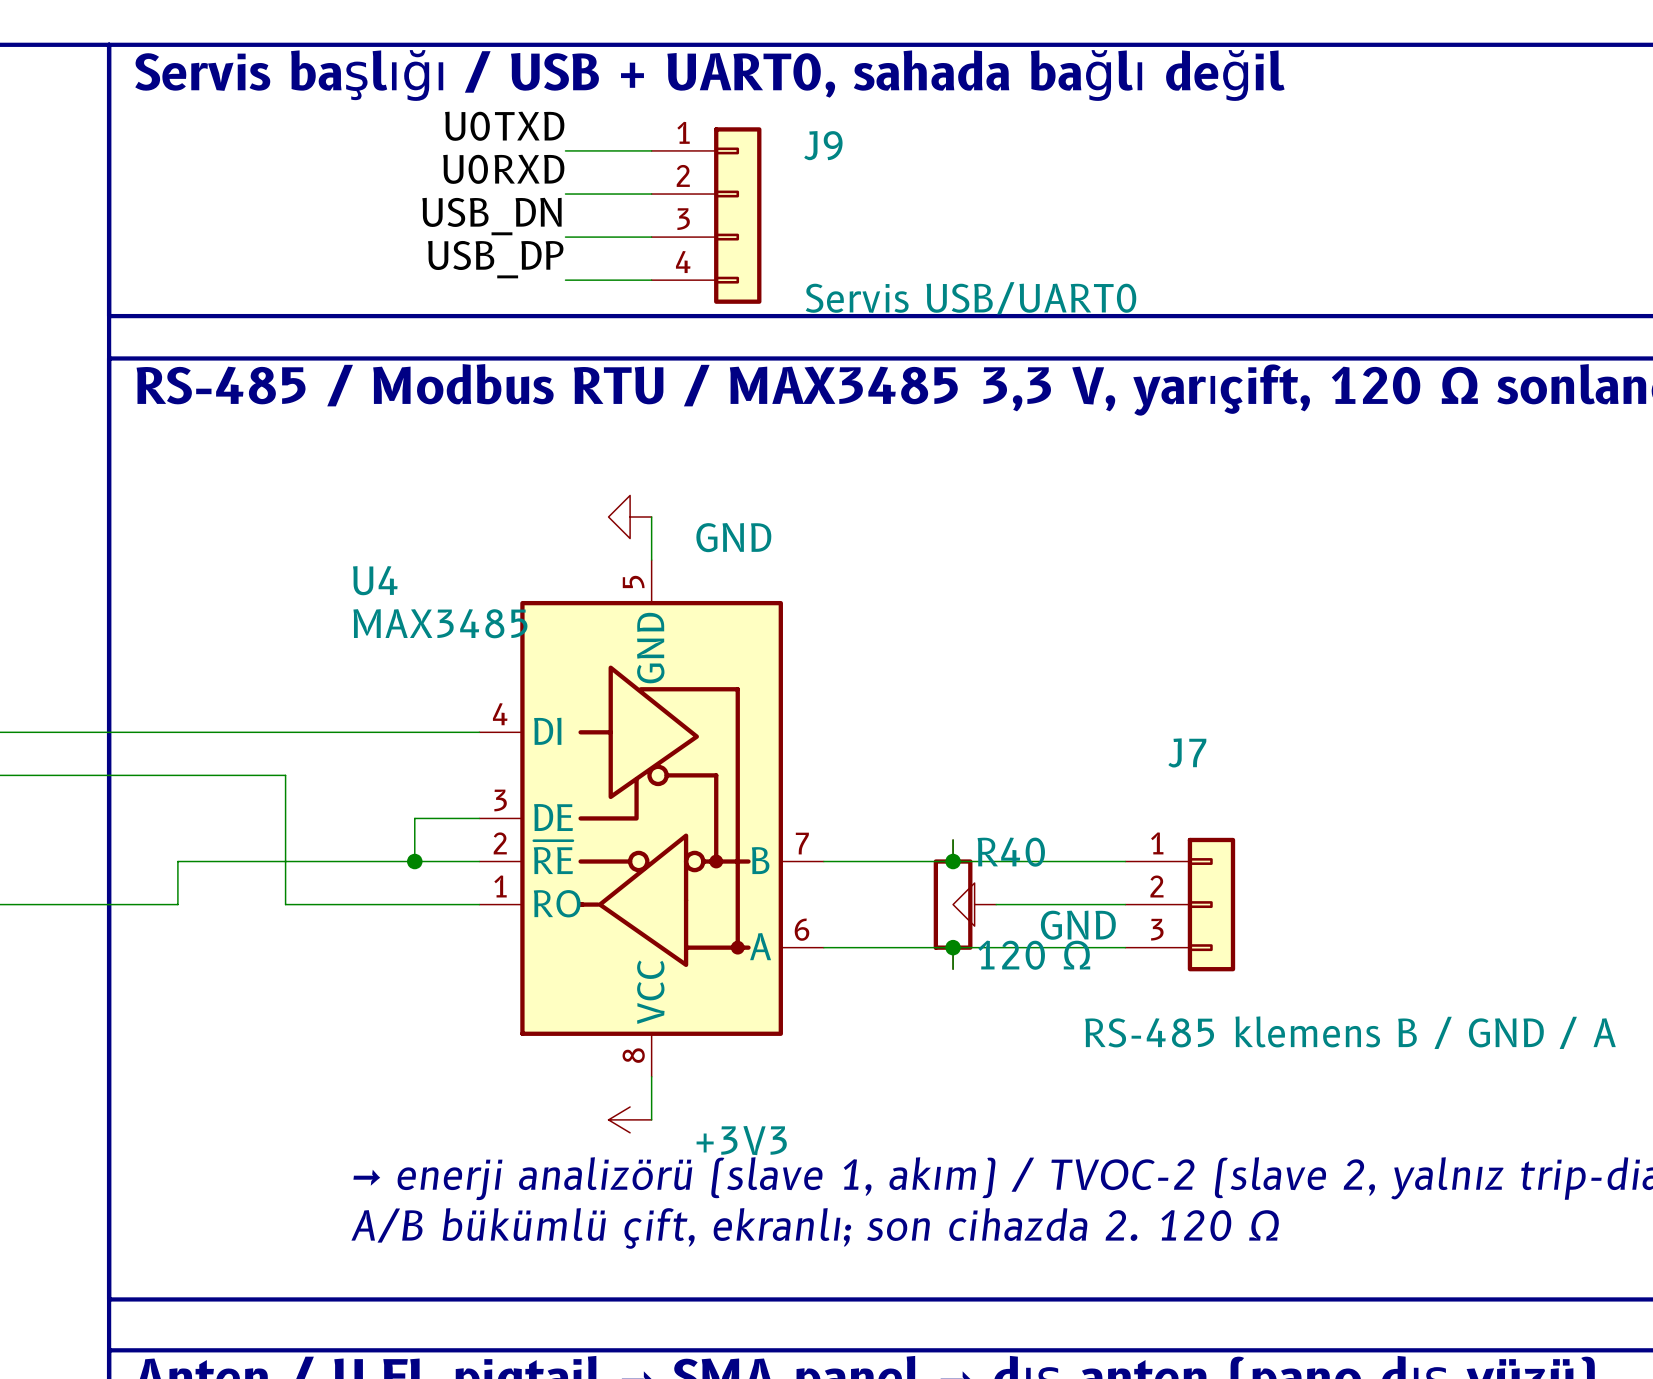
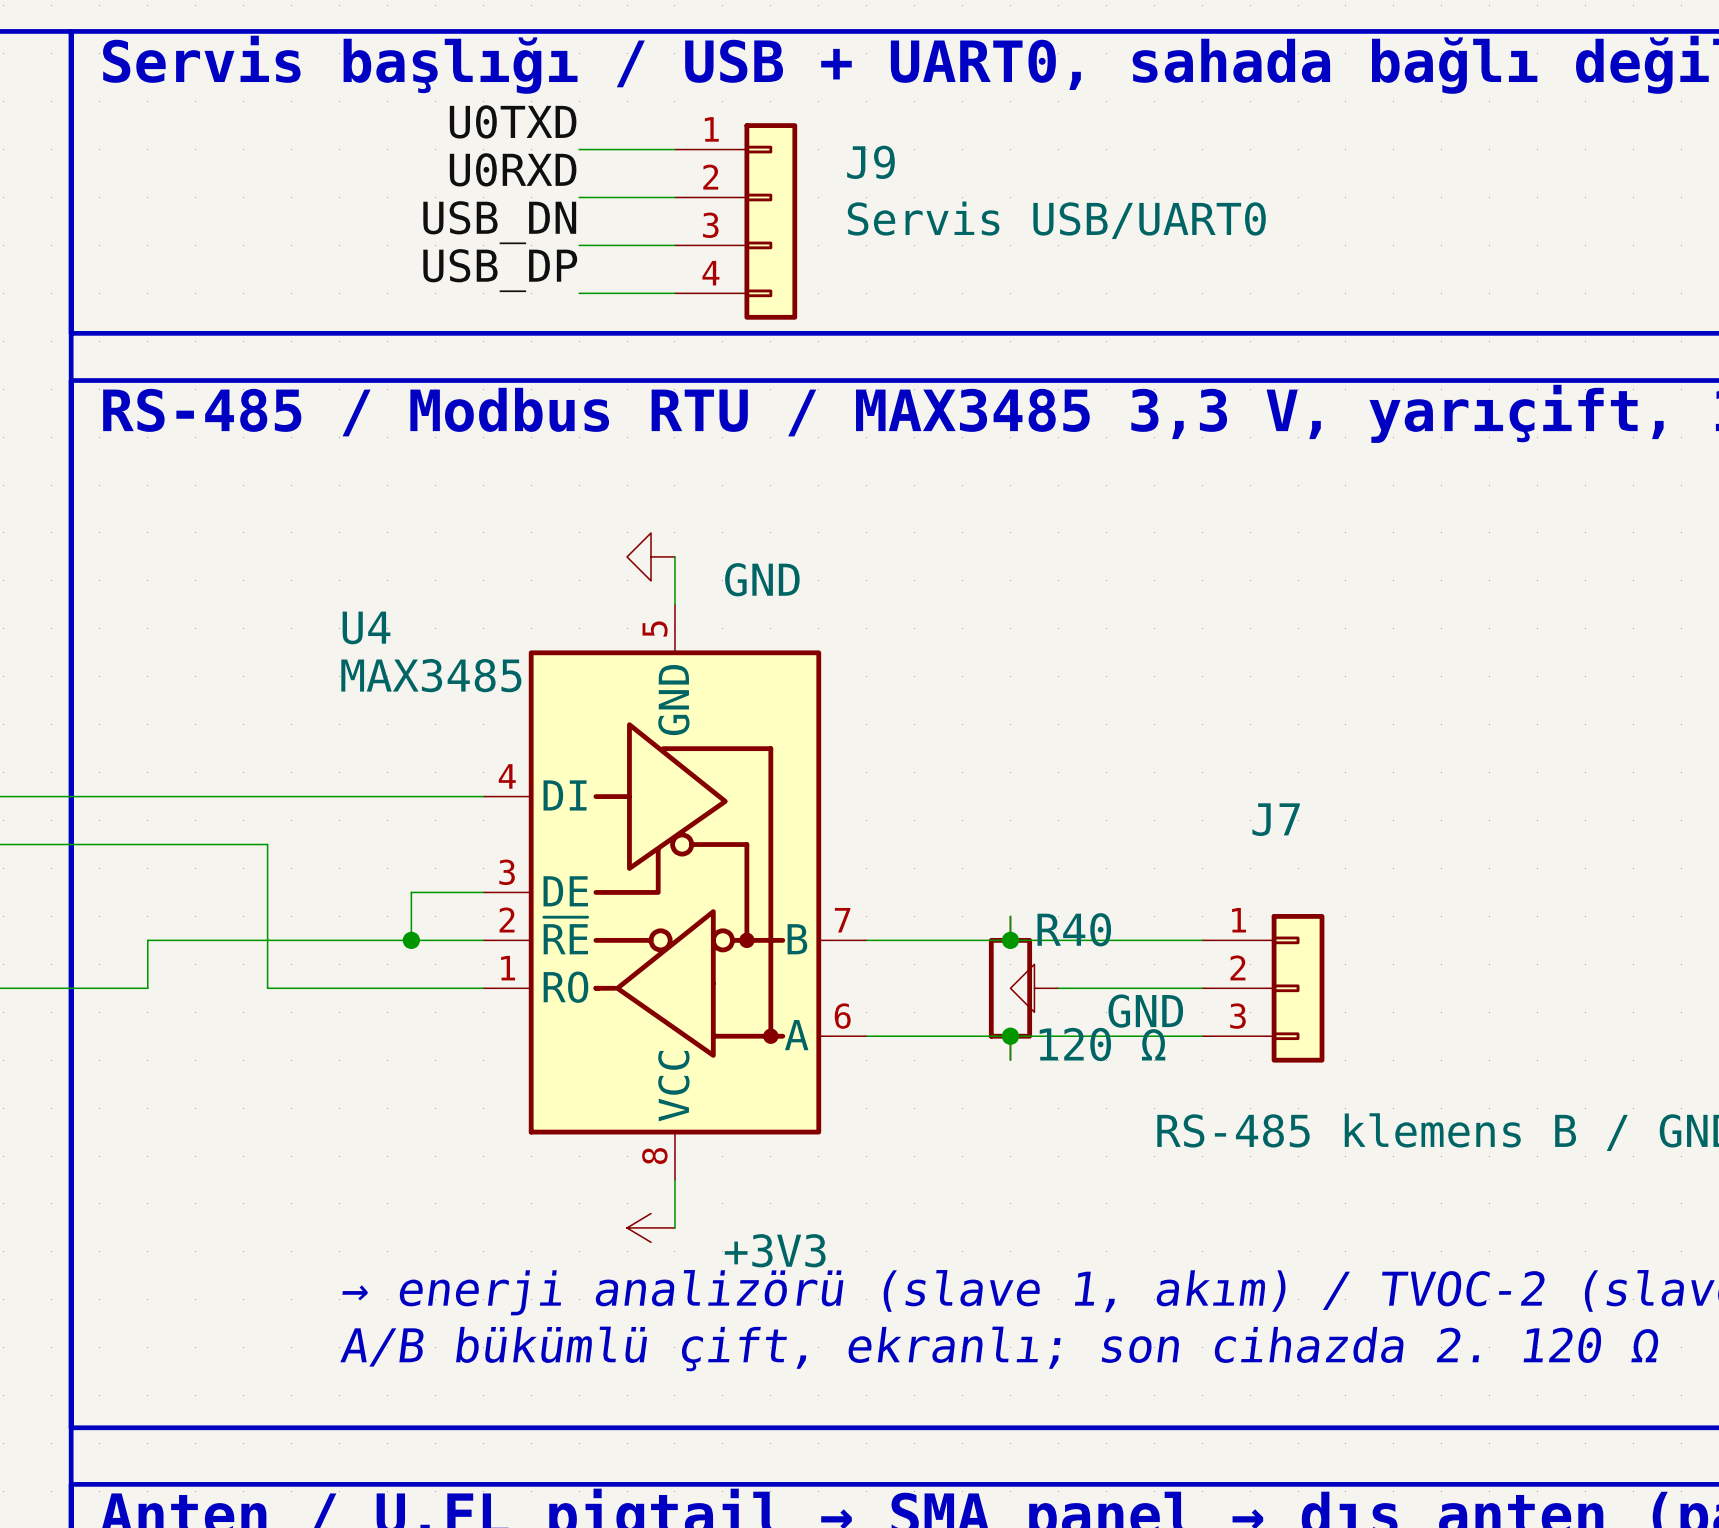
J9 name position: J9 (823, 145) -> J9 (870, 162)
J9 value position: Servis USB/UART0 (971, 298) -> Servis USB/UART0 (1056, 220)

